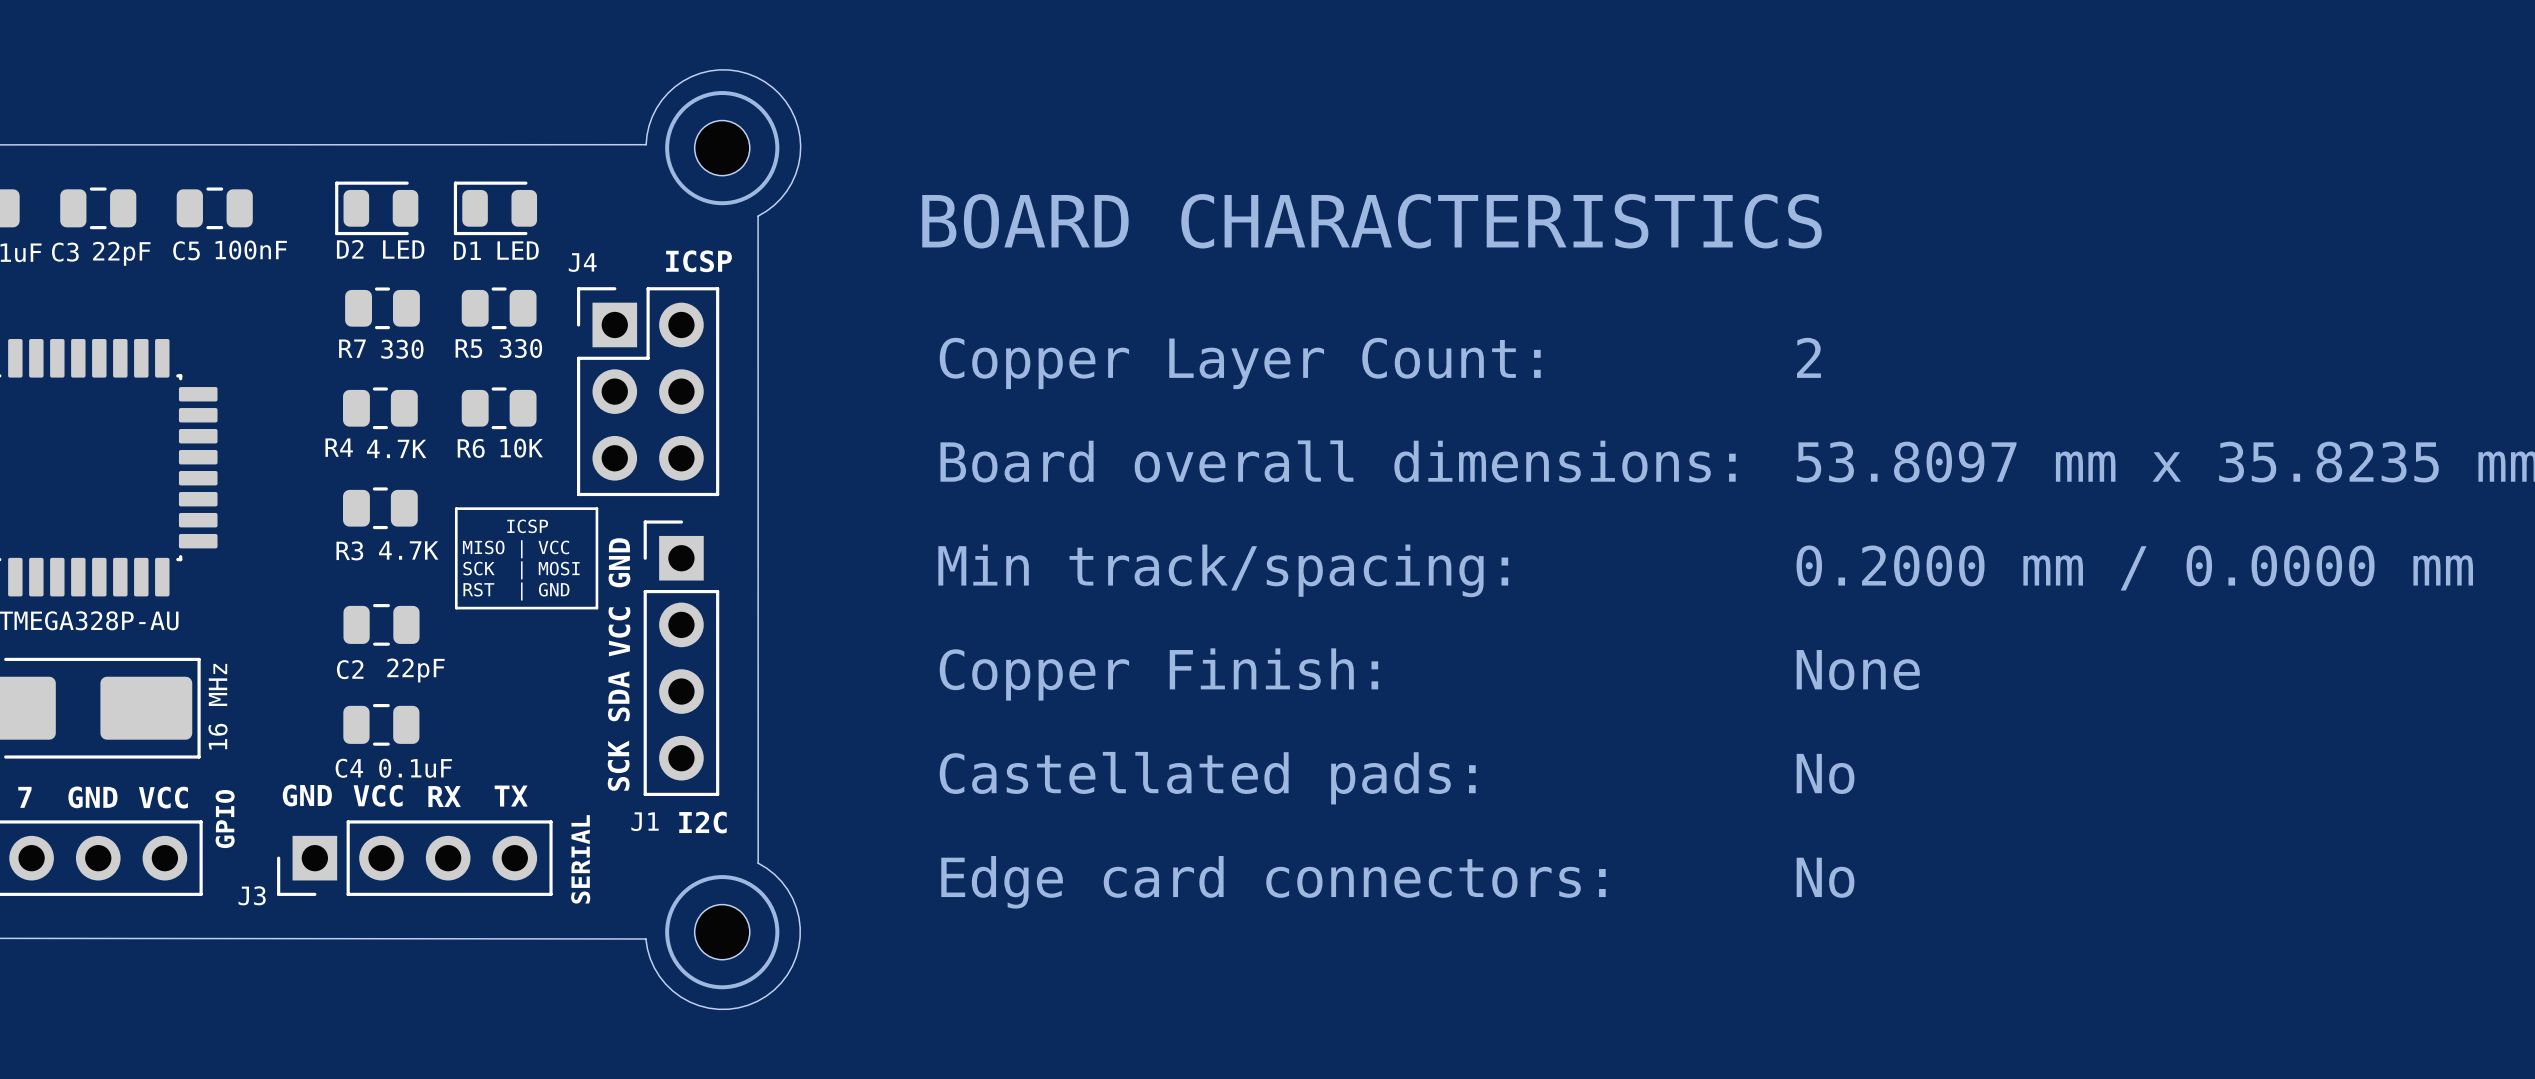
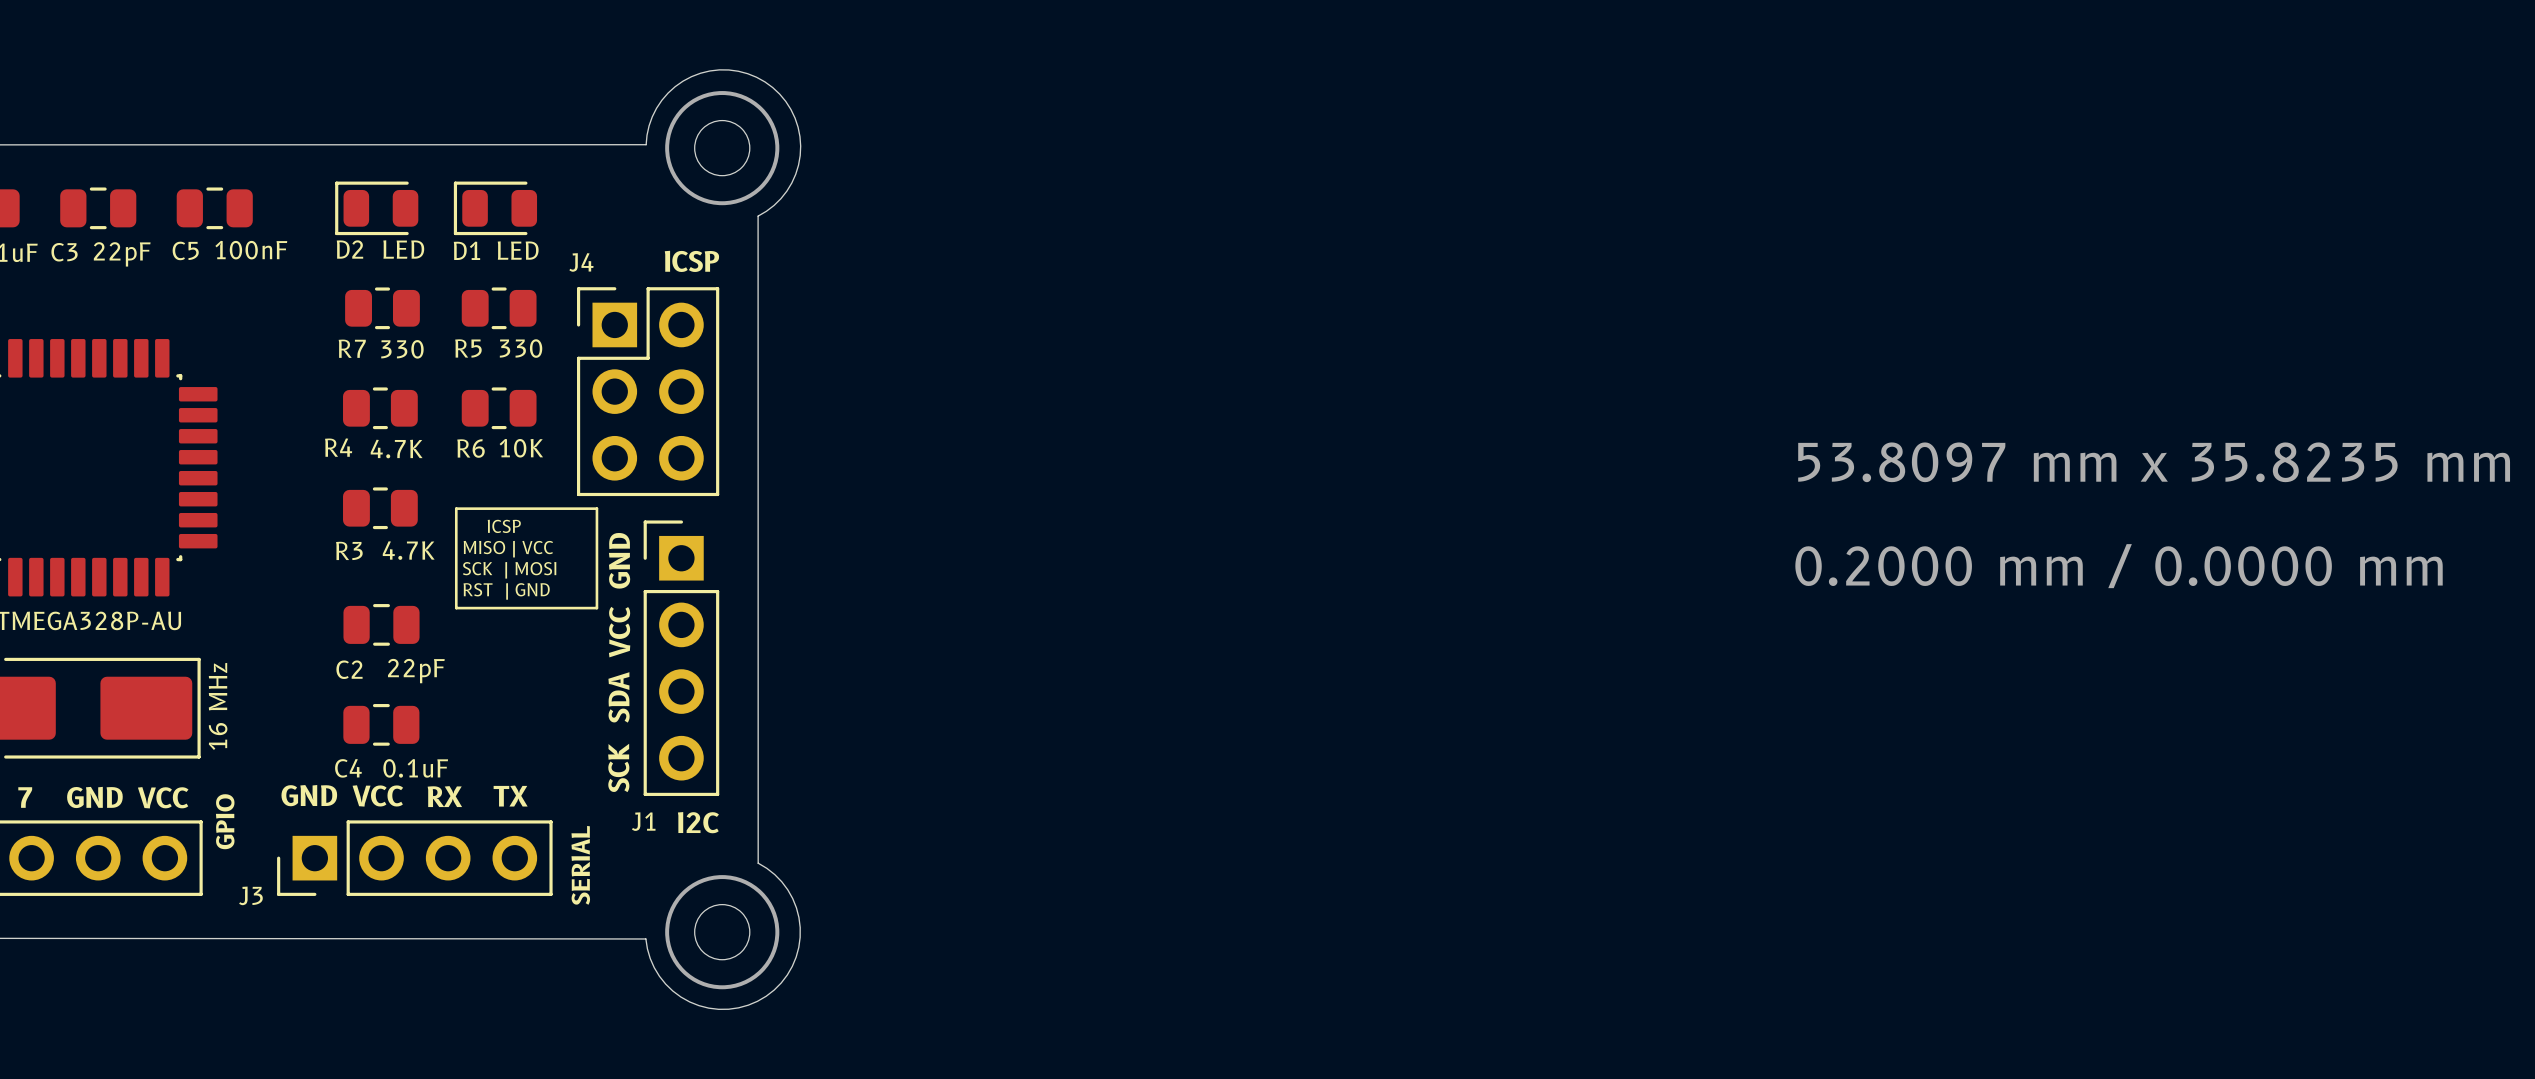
text: BOARD CHARACTERISTICS (1372, 221) -> none
text: 2 (1808, 357) -> none
text: Copper Layer Count: (1240, 363) -> none
text: Board overall dimensions: (1338, 461) -> none
text: Min track/spacing: (1223, 570) -> none
text: None (1858, 670) -> none
text: Copper Finish: (1158, 674) -> none
text: No (1825, 773) -> none
text: Castellated pads: (1207, 778) -> none
text: No (1825, 877) -> none
text: Edge card connectors: (1273, 882) -> none

